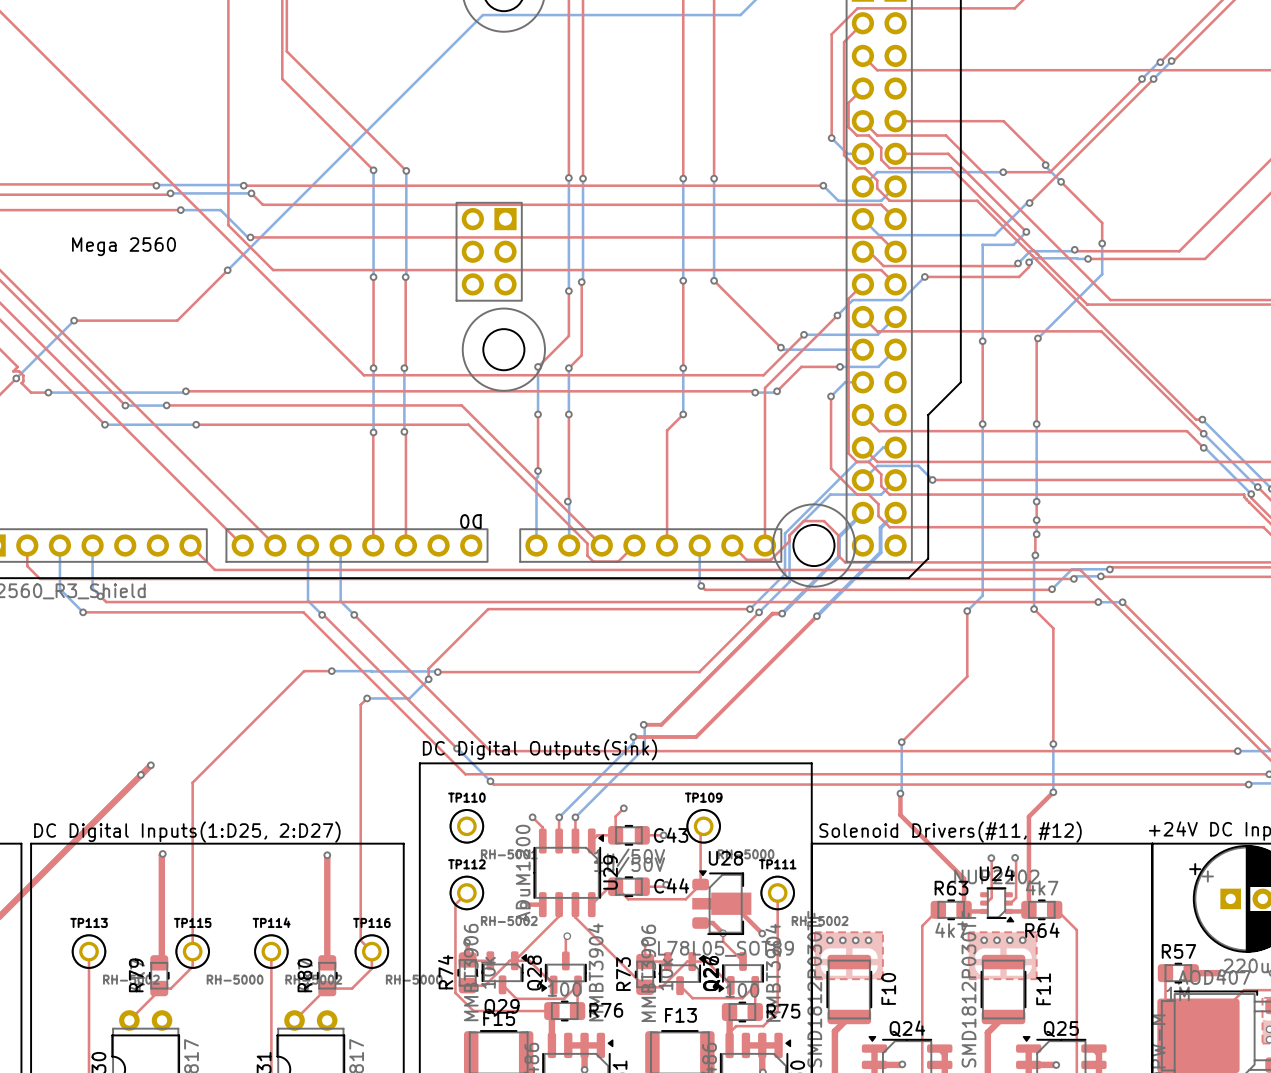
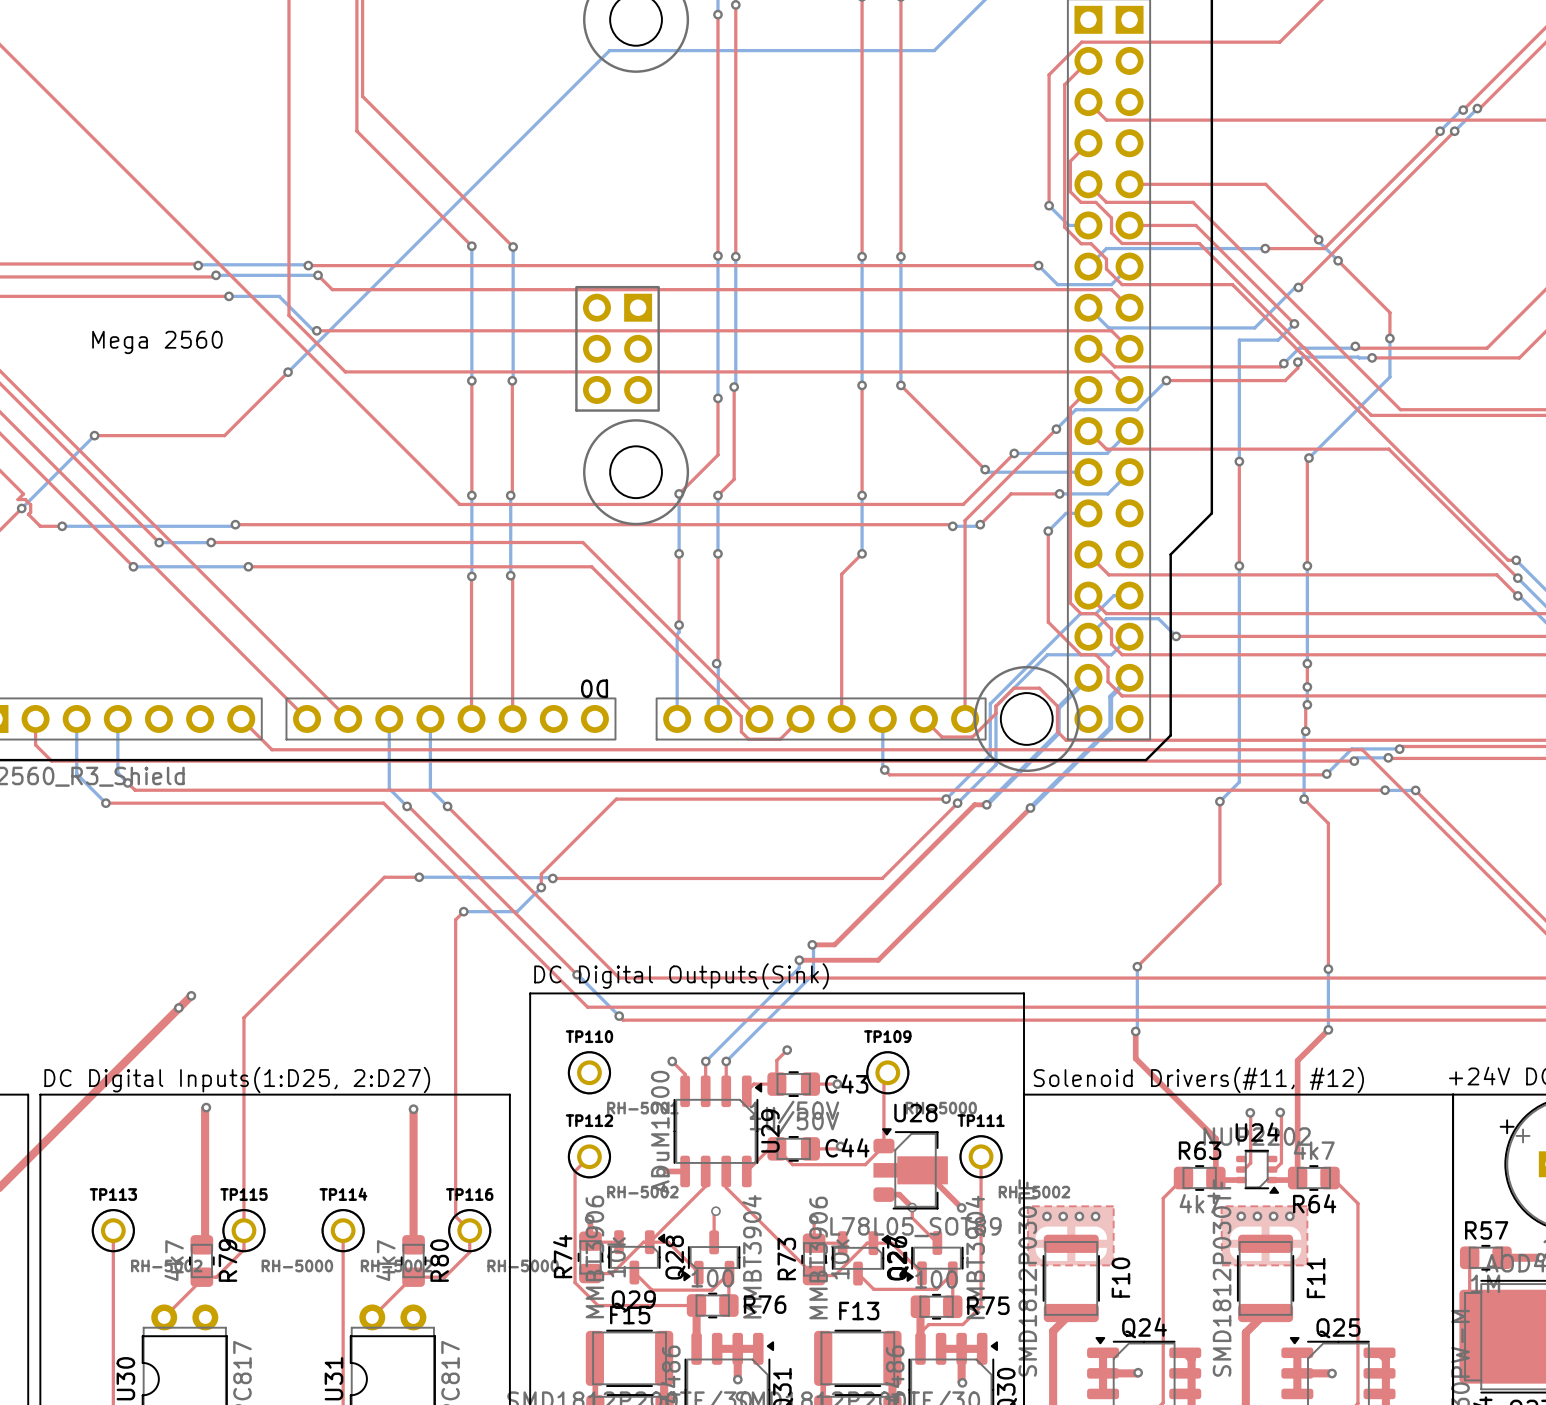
R79 name position: R79 (136, 975) -> R79 (227, 1260)
R80 name position: R80 (304, 975) -> R80 (439, 1260)

